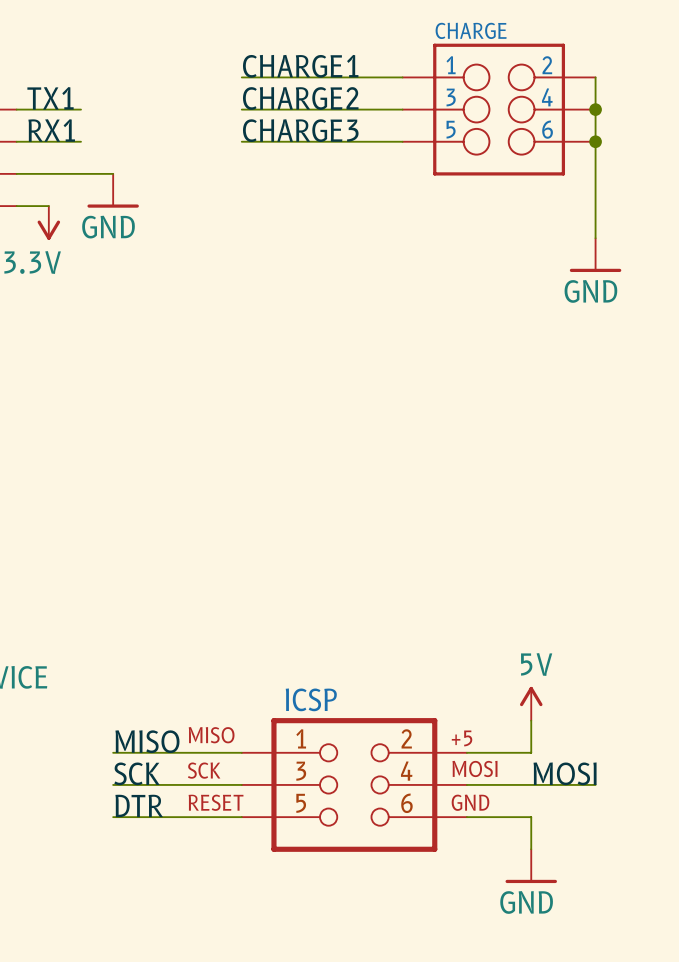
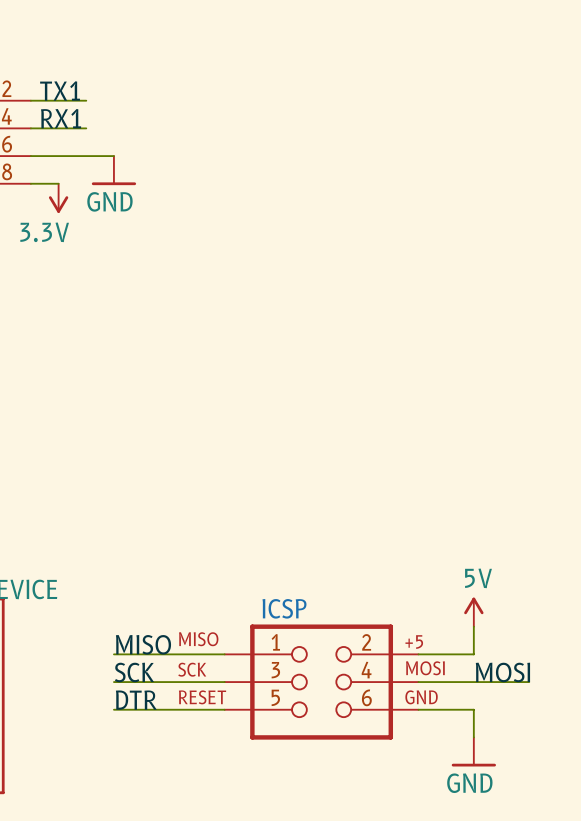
label: CHARGE1 (300, 66) -> none
wire: (241, 77) (402, 77) -> none
wire: (595, 77) (595, 238) -> none
label: CHARGE2 (300, 98) -> none
wire: (241, 109) (402, 109) -> none
CHARGE: (499, 109) -> none
junction: (595, 109) -> none
label: CHARGE3 (300, 130) -> none
wire: (241, 141) (402, 141) -> none
junction: (595, 141) -> none
power symbol: GND (595, 255) -> none

